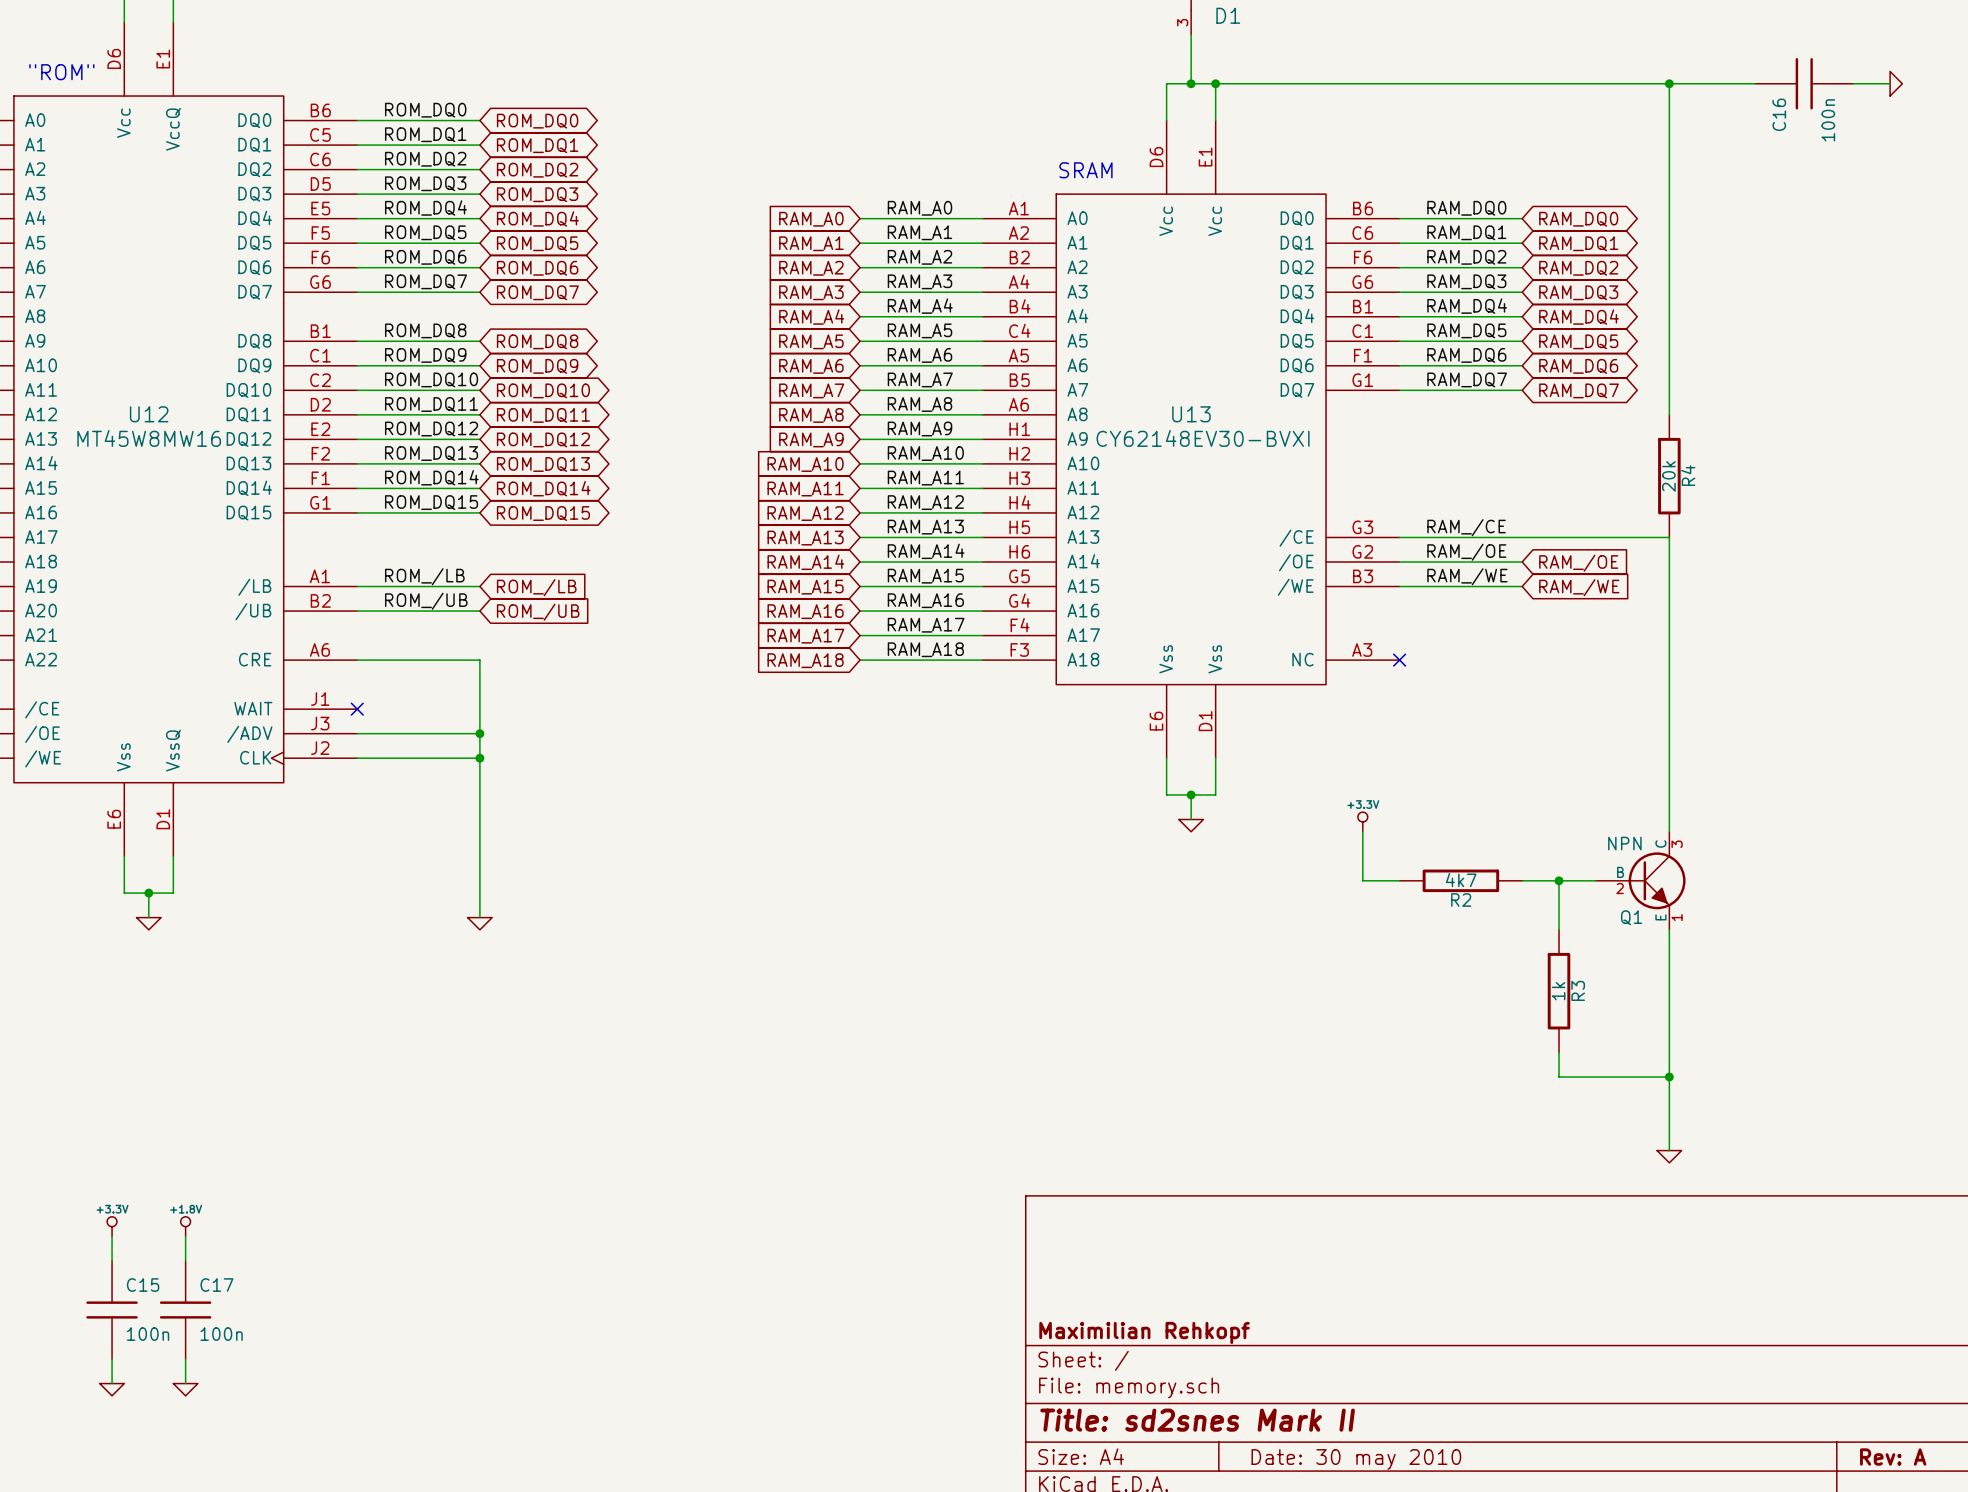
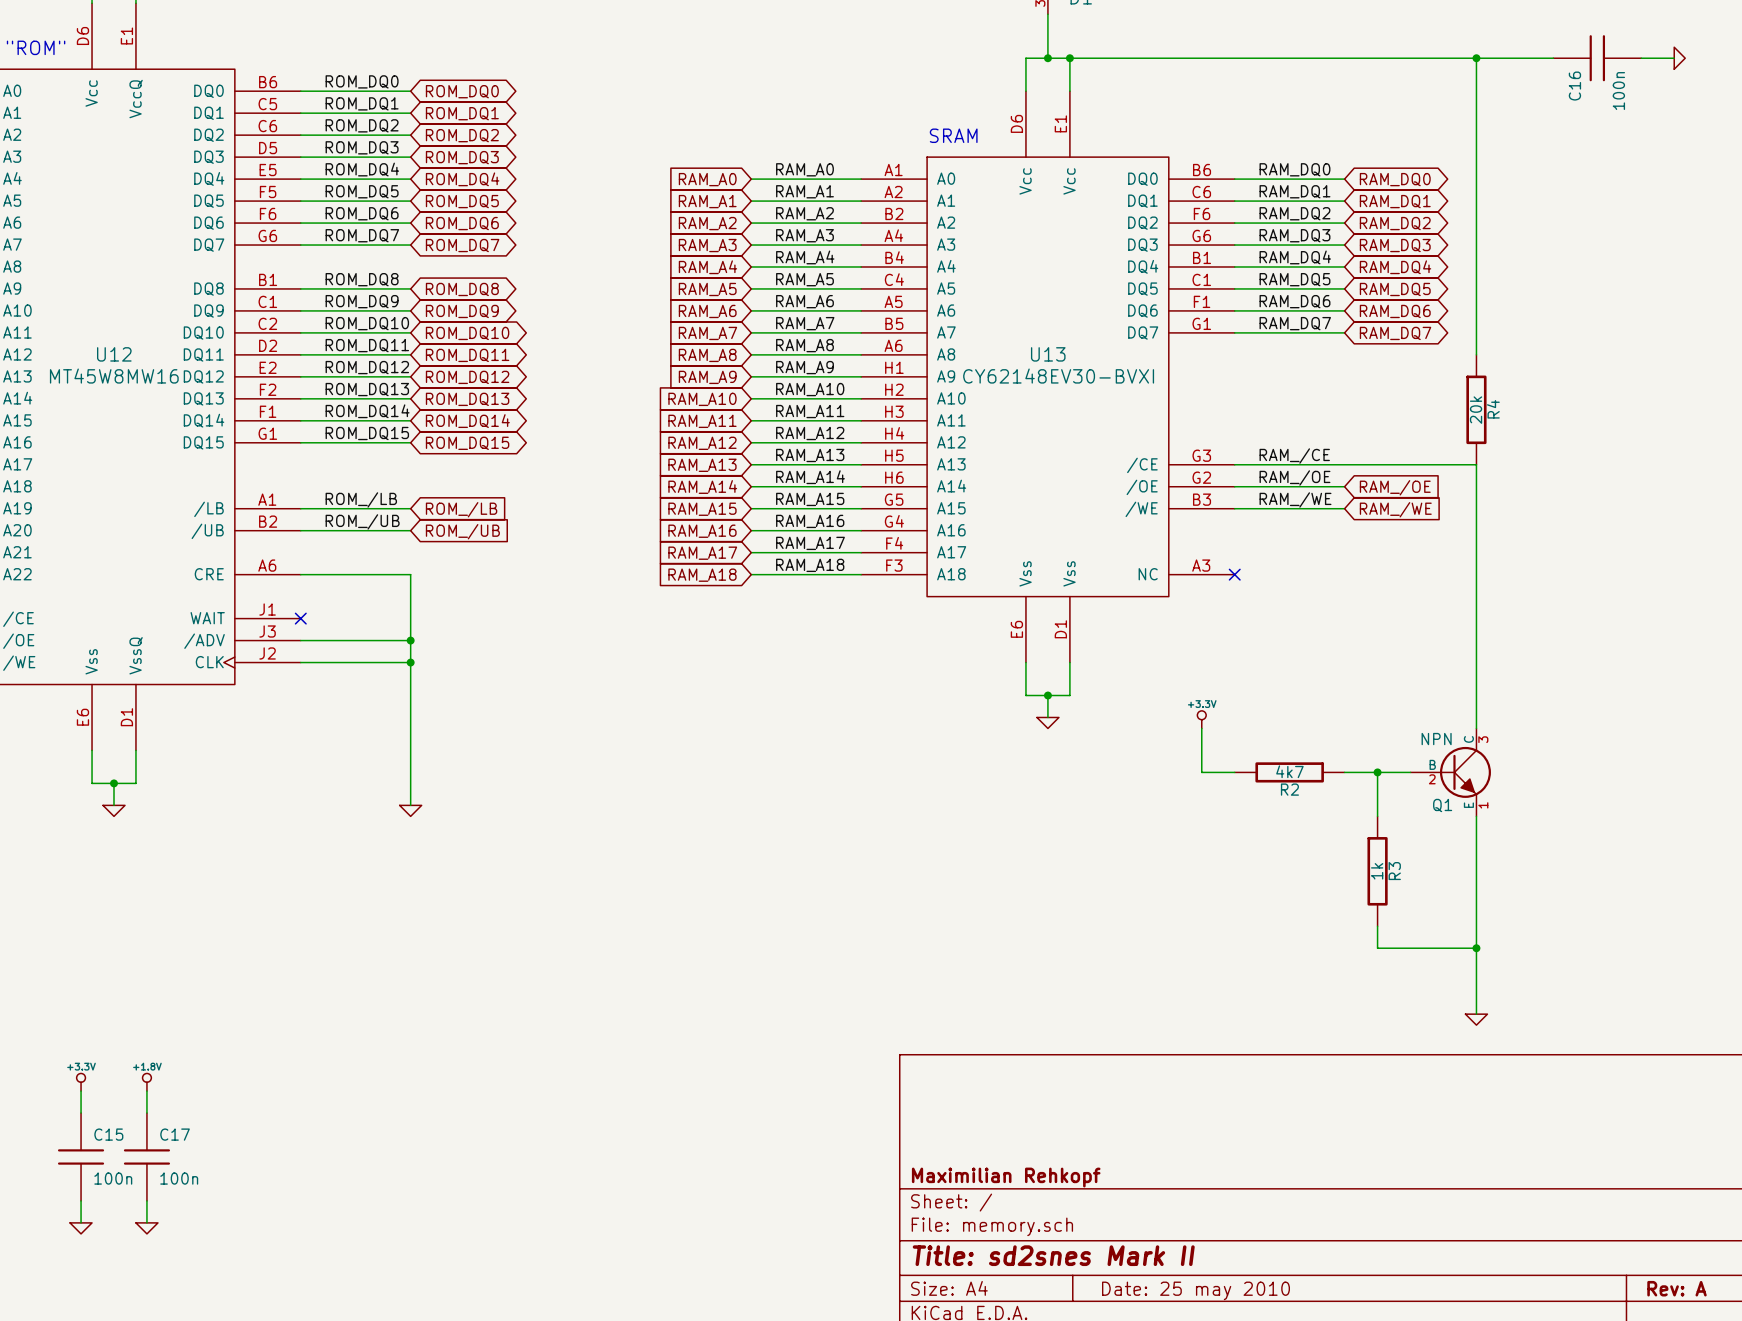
title block: Date: 30 may 2010 (1356, 1459) -> Date: 25 may 2010 (1196, 1290)

